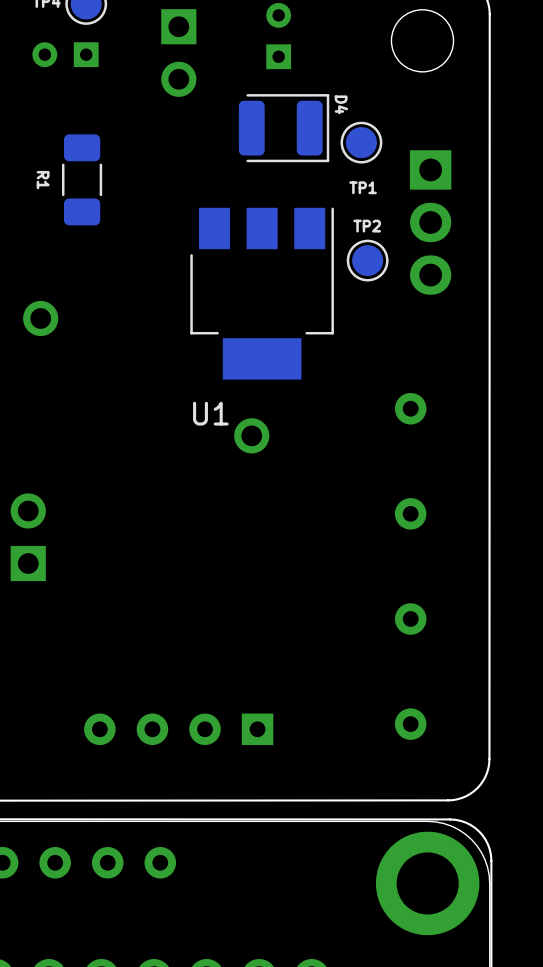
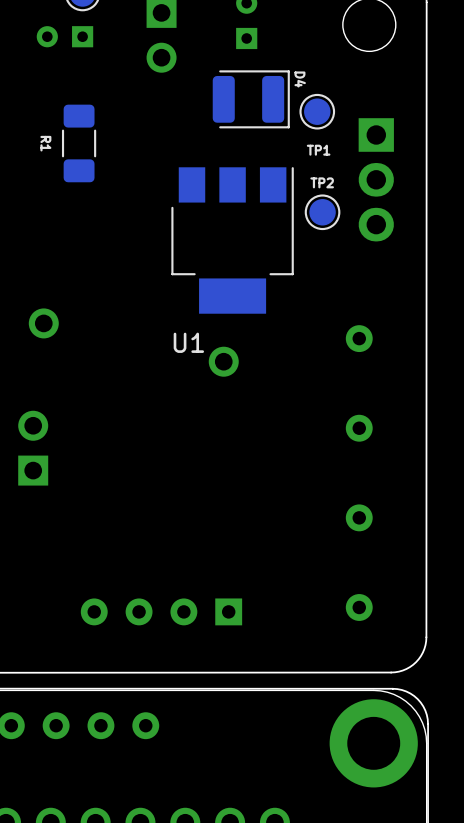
part position: (40, 318) -> (43, 323)

